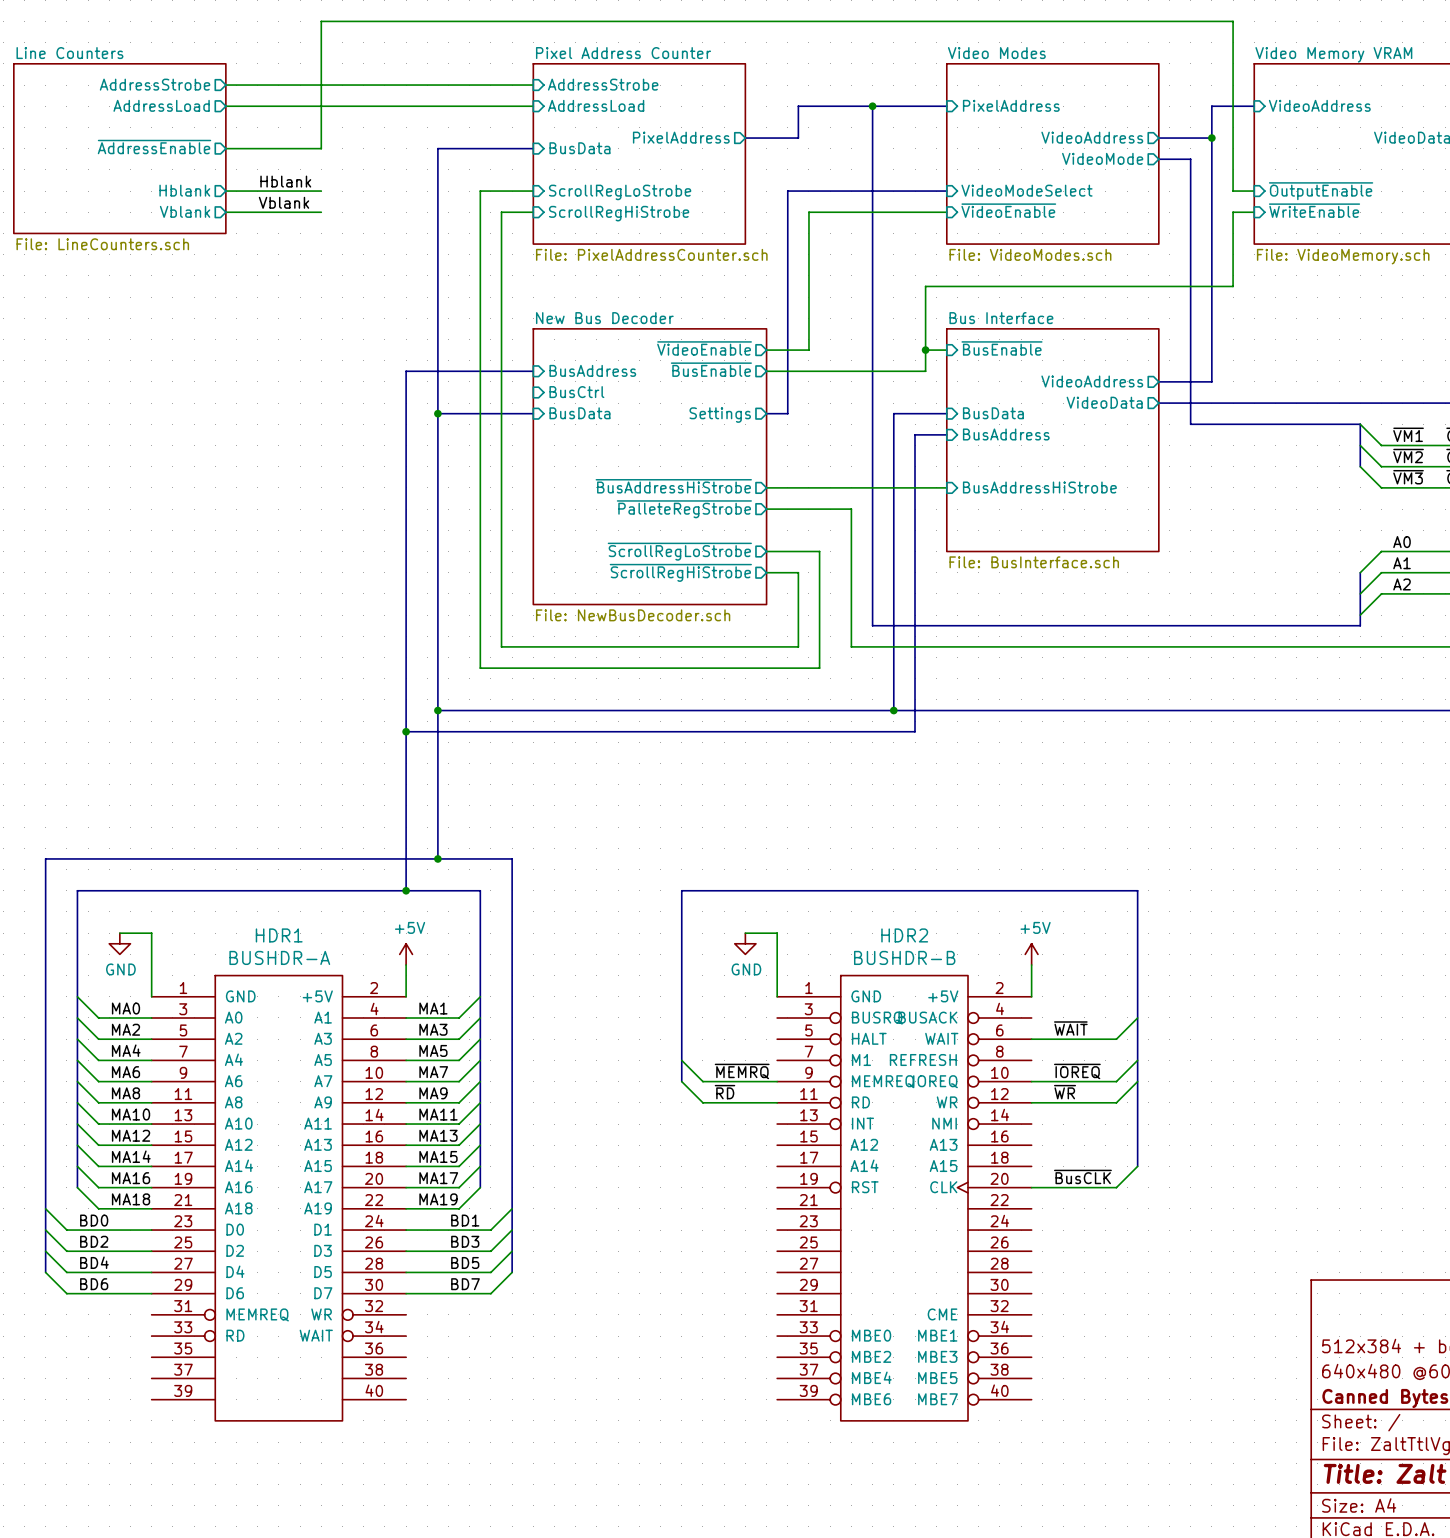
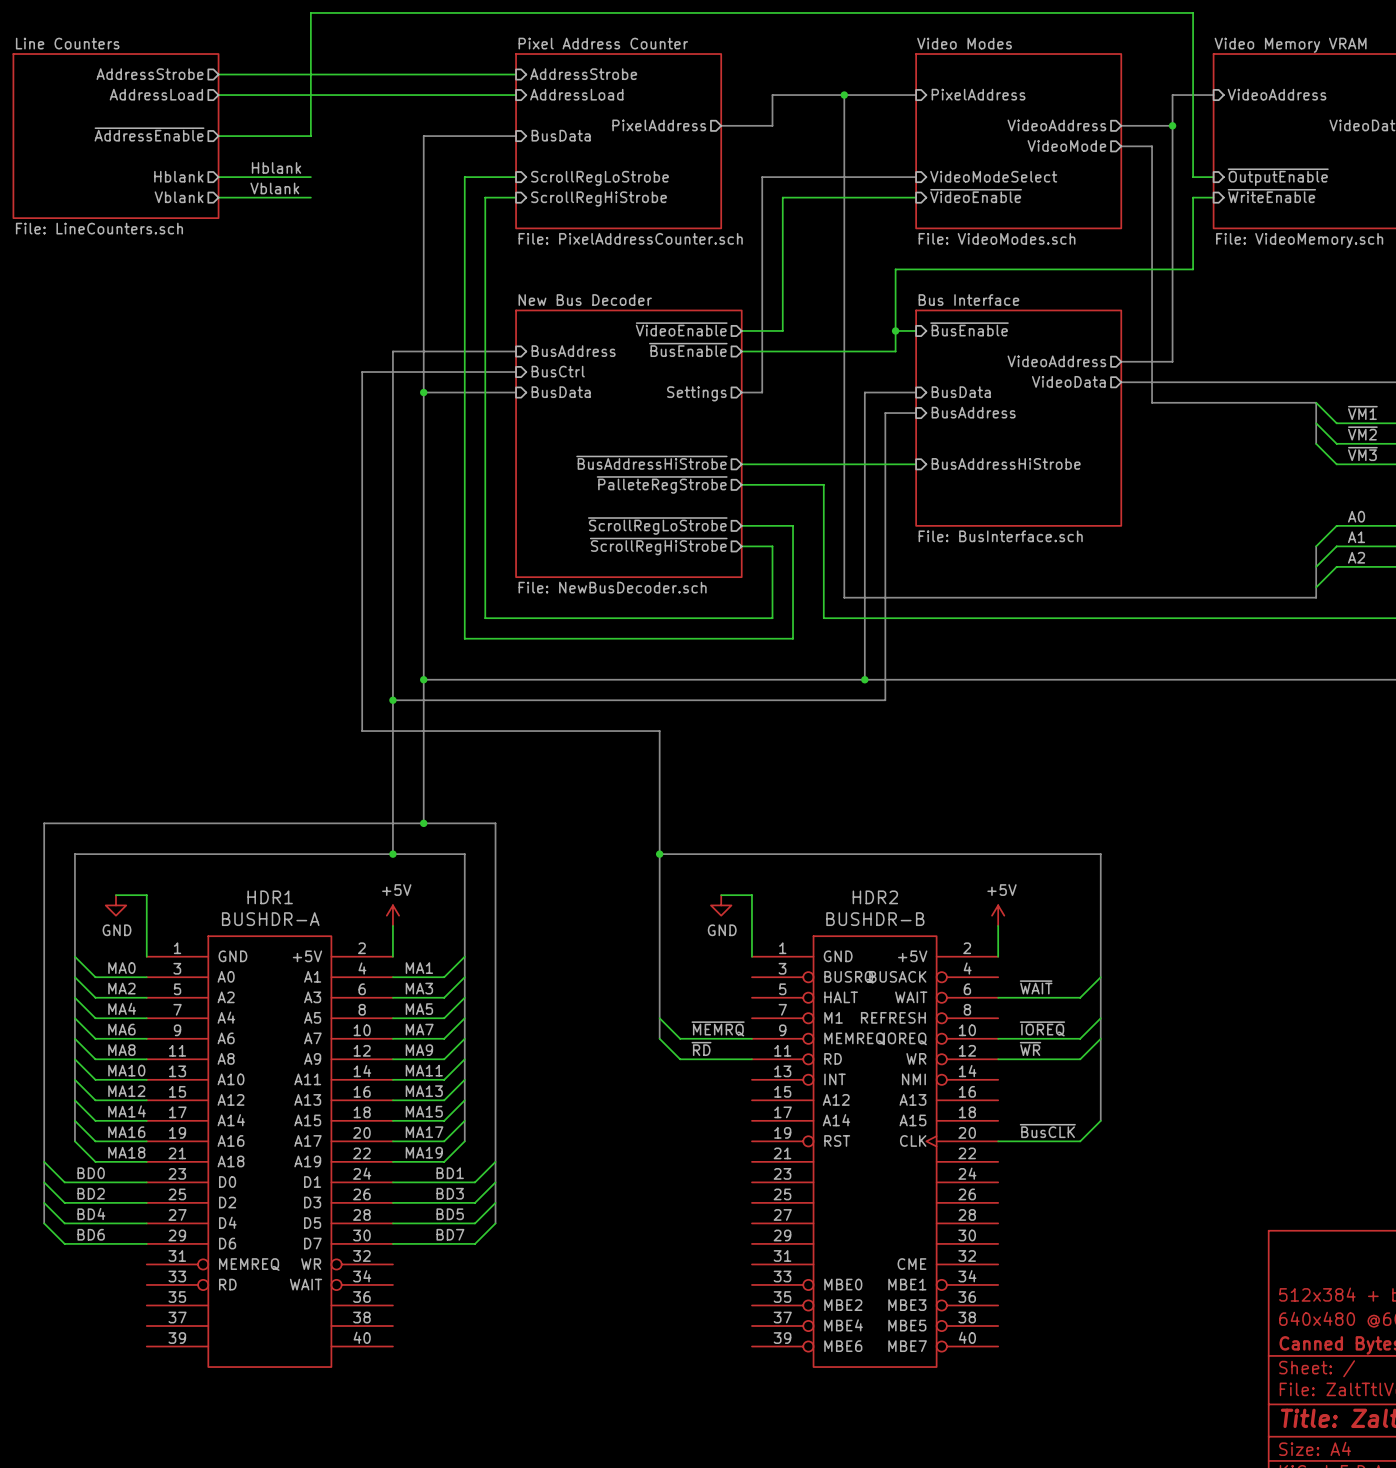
bus: none -> (516, 372) (362, 372) (362, 731) (659, 731) (659, 854)
junction: none -> (659, 854)

